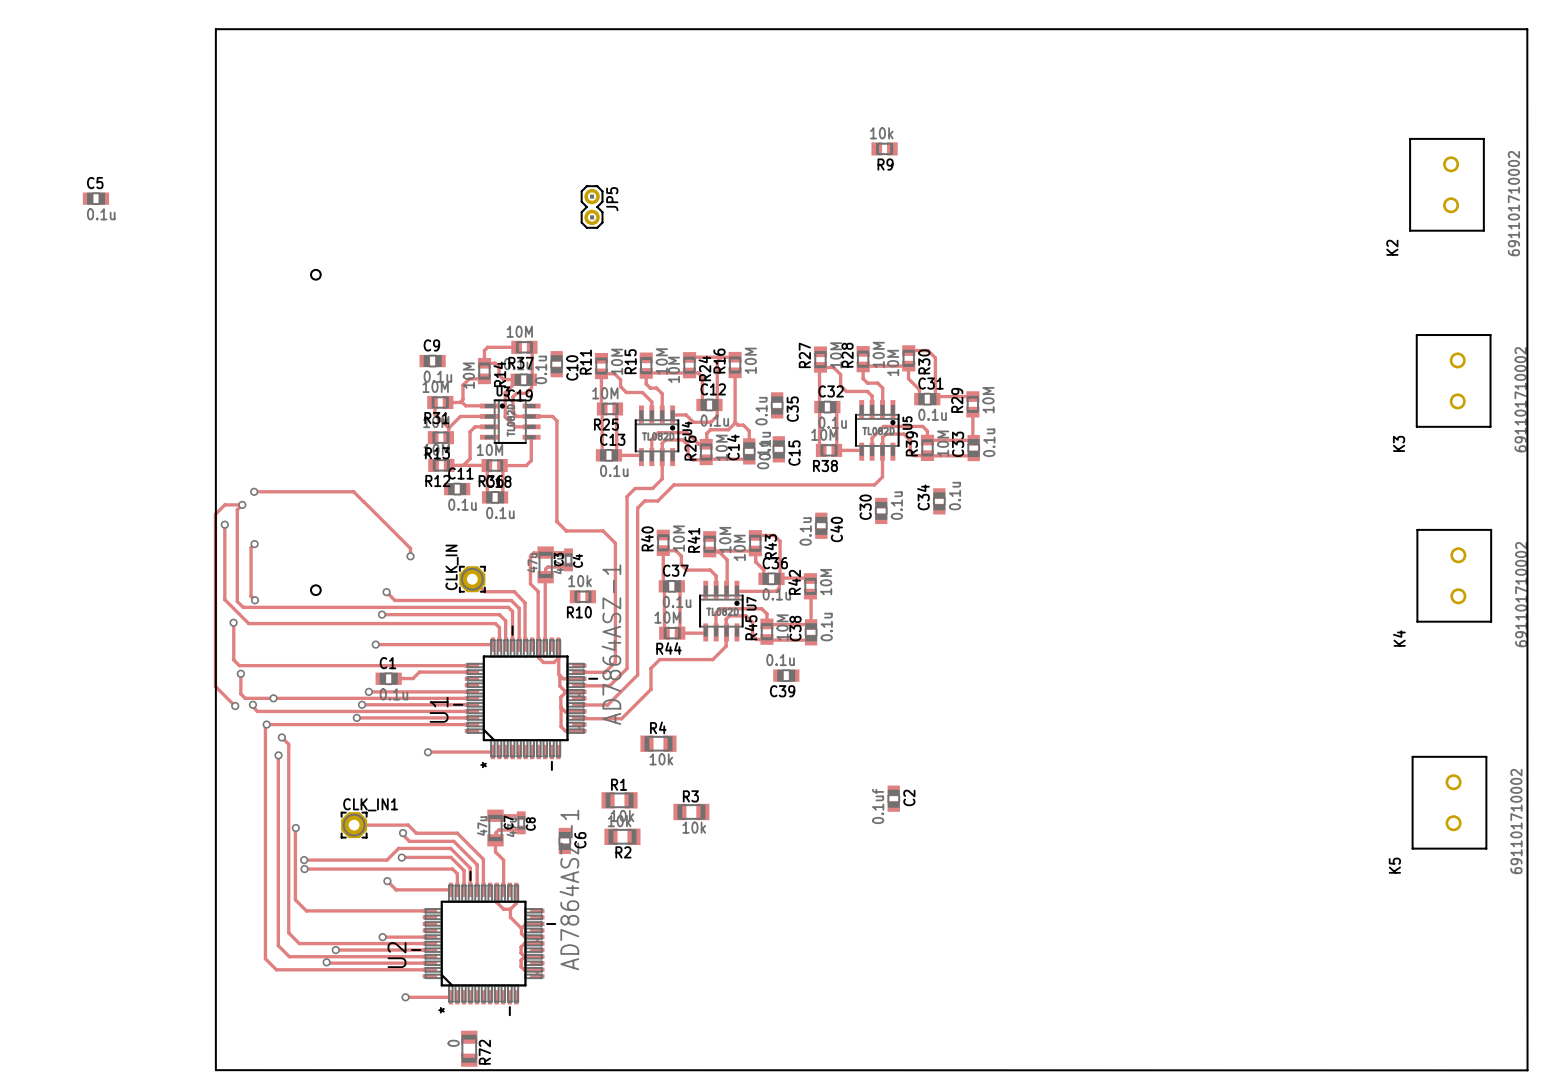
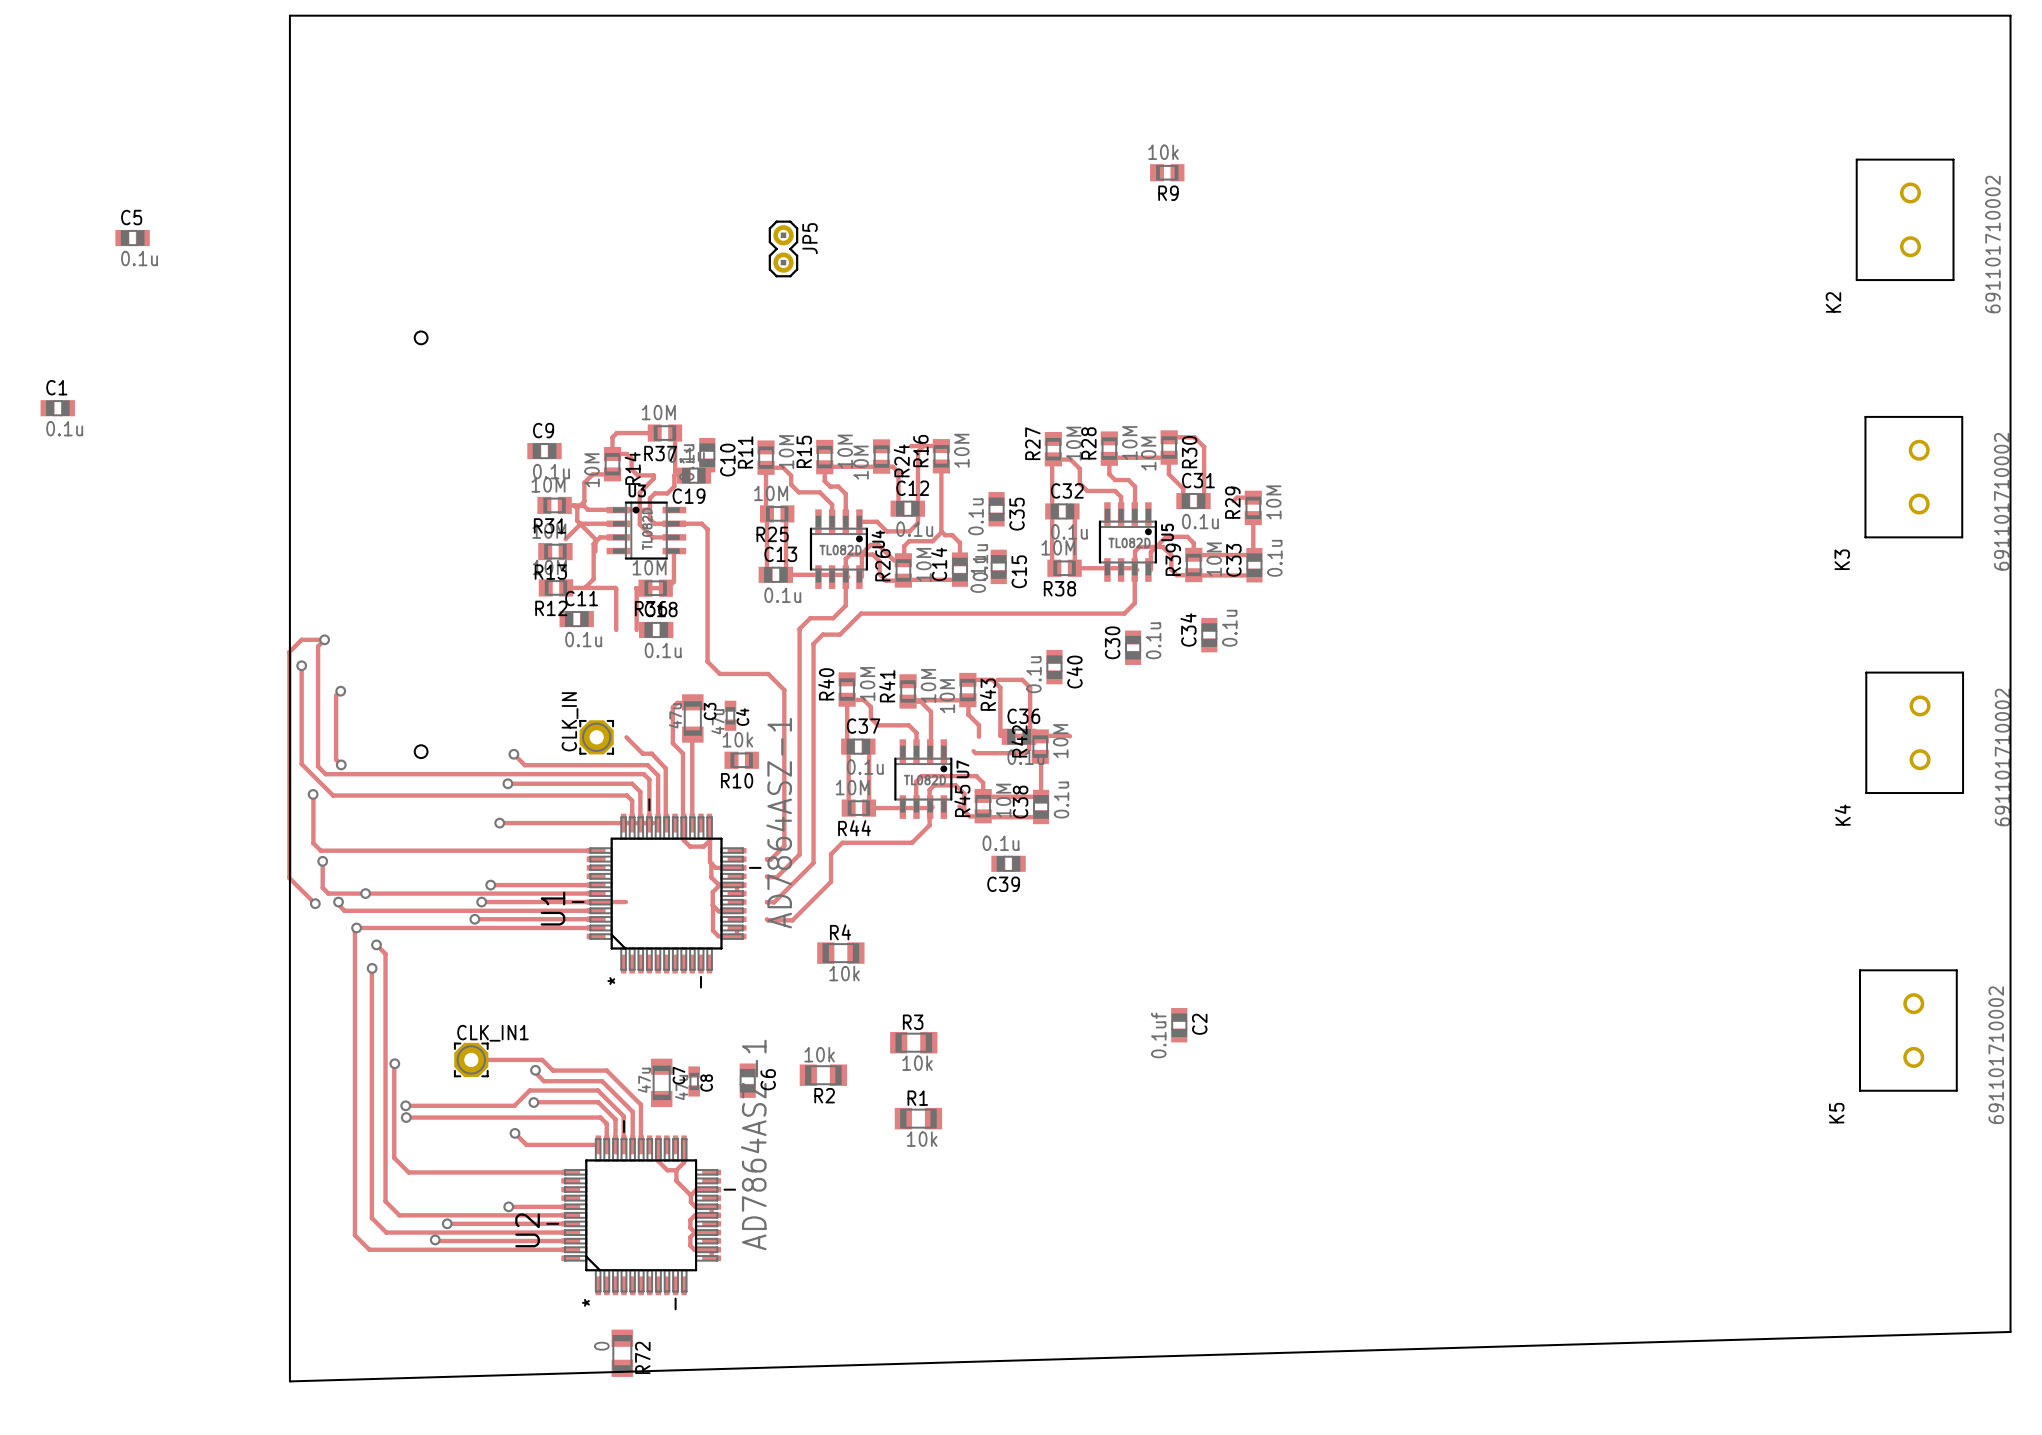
board edge: (1527, 29) (1527, 1070) (215, 1070) -> (2010, 15) (2010, 1331) (289, 1381)
track: (487, 347) (484, 350) (484, 363) (495, 363) (499, 366) (499, 375) (503, 379) (516, 379) (505, 392) (505, 417) (515, 426) (531, 426) -> (646, 433) (616, 433) (612, 437) (612, 453) (626, 453) (631, 458) (631, 469) (637, 475) (653, 475) (653, 478) (639, 492) (639, 524) (652, 537) (674, 537)
track: (493, 347) (516, 347) -> none
R37 position: (524, 347) -> (664, 433)
track: (532, 347) (531, 388) (526, 393) (516, 393) (512, 397) (512, 412) (516, 416) -> (675, 433) (674, 486) (667, 493) (654, 493) (649, 498) (649, 519) (654, 523) (684, 523)
track: (908, 350) (928, 350) (935, 357) (935, 398) -> (1169, 437) (1194, 437) (1204, 446) (1204, 500)
track: (712, 357) (735, 357) -> none
track: (721, 357) (717, 361) (717, 415) (710, 422) (693, 422) (686, 414) (672, 414) -> (923, 446) (917, 451) (917, 523) (909, 531) (886, 531) (877, 521) (859, 521)
R30 position: (908, 358) -> (1169, 447)
R27 position: (820, 359) -> (1053, 449)
R28 position: (863, 359) -> (1109, 448)
C9 position: (432, 361) -> (544, 451)
C10 position: (556, 364) -> (707, 455)
R15 position: (646, 365) -> (824, 457)
R24 position: (689, 365) -> (881, 456)
R16 position: (735, 365) -> (941, 456)
R11 position: (601, 366) -> (766, 457)
track: (863, 366) (863, 378) (867, 383) (877, 383) (882, 388) (882, 409) -> (1140, 457) (1109, 458) (1109, 474) (1115, 480) (1128, 480) (1135, 486) (1134, 514)
track: (886, 366) (908, 366) (908, 378) (919, 389) (919, 399) -> (1169, 457) (1168, 474) (1183, 488) (1183, 501)
R14 position: (484, 371) -> (612, 464)
track: (735, 372) (735, 423) (728, 429) (710, 429) (706, 433) (706, 444) (698, 444) (687, 432) (664, 432) -> (941, 466) (941, 532) (932, 541) (909, 541) (904, 546) (903, 560) (893, 560) (878, 545)
track: (601, 373) (601, 455) -> (766, 467) (765, 574)
track: (601, 373) (614, 373) (620, 379) (620, 386) (626, 392) (642, 392) (651, 401) (651, 414) -> (766, 467) (783, 467) (791, 475) (791, 484) (798, 492) (819, 492) (832, 504) (832, 521)
track: (646, 373) (646, 383) (650, 388) (656, 388) (662, 393) (662, 414) -> (855, 466) (824, 467) (824, 481) (830, 486) (838, 486) (845, 493) (845, 521)
track: (675, 373) (698, 373) (702, 377) (701, 404) -> (892, 466) (898, 472) (897, 508)
track: (484, 378) (469, 378) (462, 385) (462, 399) (460, 402) -> (612, 474) (592, 474) (584, 482) (584, 501) (580, 505)
track: (950, 396) (972, 396) -> none
C31 position: (927, 399) -> (1193, 501)
R31 position: (440, 402) -> (554, 505)
track: (448, 402) (462, 402) (465, 405) -> (564, 505) (583, 505) (587, 509) (617, 509)
C12 position: (709, 404) -> (907, 508)
R29 position: (972, 404) -> (1253, 507)
C35 position: (777, 405) -> (996, 509)
C32 position: (827, 407) -> (1062, 511)
track: (835, 407) (836, 408) (836, 450) -> (1072, 511) (1074, 513) (1074, 568) (1104, 568)
R25 position: (609, 408) -> (777, 513)
track: (617, 408) (616, 455) -> (787, 513) (786, 574) (815, 574)
track: (872, 409) (872, 396) (867, 391) (846, 391) (840, 385) (840, 374) (833, 367) (820, 367) (819, 448) (821, 450) -> (1121, 514) (1121, 496) (1115, 490) (1087, 490) (1079, 483) (1079, 468) (1070, 459) (1053, 459) (1052, 566) (1054, 568)
track: (972, 412) (973, 440) (951, 440) -> (1253, 518) (1254, 555)
track: (460, 416) (448, 428) -> (610, 523) (581, 523) (565, 539)
track: (466, 416) (488, 416) -> (566, 587) (595, 587)
track: (529, 416) (552, 416) (556, 420) (556, 521) (566, 530) -> (701, 523) (707, 529) (707, 661) (719, 673) (749, 673)
U3 position: (510, 421) -> (646, 530)
track: (735, 422) (738, 425) (743, 425) (749, 431) (749, 443) -> (941, 531) (945, 535) (952, 535) (959, 542) (959, 559)
track: (488, 426) (475, 426) (470, 431) (470, 458) (463, 465) -> (618, 537) (600, 537) (593, 543) (593, 579) (584, 587)
track: (899, 426) (922, 426) (927, 431) (927, 440) -> (1187, 536) (1193, 543) (1194, 555) (1223, 555)
U5 position: (877, 430) -> (1127, 542)
U4 position: (657, 435) -> (838, 549)
R13 position: (440, 437) -> (555, 551)
track: (531, 437) (531, 460) (526, 465) (503, 465) -> (674, 551) (673, 581) (667, 588)
R39 position: (927, 447) -> (1193, 564)
C33 position: (973, 448) -> (1254, 565)
C15 position: (778, 449) -> (998, 566)
R38 position: (829, 450) -> (1064, 568)
C14 position: (749, 451) -> (959, 569)
R26 position: (706, 452) -> (903, 570)
C13 position: (608, 455) -> (775, 574)
track: (927, 455) (914, 455) (910, 451) (910, 440) (903, 434) (886, 434) (882, 437) (882, 477) (874, 484) (851, 484) -> (1223, 575) (1176, 575) (1171, 569) (1171, 555) (1162, 546) (1139, 546) (1135, 551) (1134, 603) (1124, 613)
track: (951, 455) (973, 455) -> none
track: (706, 459) (692, 459) (688, 454) (688, 445) (682, 439) (665, 439) (662, 443) (662, 478) (652, 488) (635, 488) (627, 496) (627, 668) (609, 685) (587, 685) -> (933, 579) (886, 580) (879, 574) (879, 561) (872, 554) (850, 554) (845, 558) (845, 605) (833, 618) (810, 618) (799, 628) (799, 854) (776, 877)
track: (726, 459) (749, 459) -> none
R12 position: (441, 465) -> (555, 587)
track: (463, 465) (487, 465) (487, 497) -> (615, 587) (616, 629)
track: (502, 465) (502, 497) -> (665, 588) (636, 588) (636, 629)
track: (673, 484) (657, 500) (644, 500) (637, 508) (637, 675) (607, 704) (584, 704) -> (890, 613) (861, 613) (840, 634) (822, 634) (813, 643) (813, 862) (774, 902)
C11 position: (457, 489) -> (576, 619)
track: (254, 491) (353, 491) (410, 548) (410, 556) -> none
via: (254, 491) -> none
C34 position: (939, 501) -> (1209, 635)
C30 position: (881, 510) -> (1133, 647)
C40 position: (821, 525) -> (1054, 667)
track: (580, 530) (603, 530) (615, 543) (615, 662) (605, 672) (582, 672) -> (768, 673) (784, 690) (784, 846) (770, 859)
track: none -> (967, 679) (992, 679) (1000, 687) (1000, 735) (1030, 735)
R40 position: (663, 542) -> (847, 689)
R43 position: (755, 543) -> (967, 690)
R41 position: (709, 544) -> (908, 691)
track: (710, 551) (719, 552) (727, 559) (726, 589) -> (939, 700) (908, 701) (920, 701) (930, 711) (930, 751)
track: (732, 551) (755, 551) (755, 561) (763, 570) (763, 578) -> (967, 700) (968, 714) (978, 725) (978, 736)
track: none -> (692, 702) (677, 702) (672, 707) (672, 743) (682, 753) (683, 840) (690, 846) (703, 846) (710, 840)
track: (568, 552) (533, 553) (530, 556) (530, 583) (538, 591) (538, 657) (543, 662) (553, 662) (558, 657) -> none
via: (410, 556) -> none
C4 position: (568, 559) -> (730, 715)
C3 position: (545, 564) -> (692, 718)
track: (568, 567) (547, 567) (545, 569) (545, 644) -> none
track: (686, 570) (681, 564) (681, 556) (675, 550) (663, 550) (664, 633) -> (907, 725) (878, 725) (870, 718) (870, 707) (863, 699) (847, 699) (848, 808)
track: (687, 570) (710, 570) (716, 575) (716, 589) -> (908, 725) (916, 732) (916, 751)
track: none -> (692, 734) (692, 823)
CLK_IN position: (472, 579) -> (596, 737)
C37 position: (671, 586) -> (858, 746)
track: (679, 586) (680, 633) -> (868, 746) (869, 808) (898, 808)
R42 position: (810, 586) -> (1040, 746)
track: (491, 591) (514, 591) (525, 602) (525, 644) -> (651, 753) (665, 768) (666, 823)
track: (810, 594) (811, 624) (788, 624) -> (1040, 756) (1041, 796)
R10 position: (582, 596) -> (741, 760)
track: (488, 600) (511, 600) (519, 608) (519, 644) -> (647, 765) (658, 775) (658, 823)
track: (485, 607) (508, 607) (512, 611) (512, 644) -> (643, 774) (649, 779) (649, 823)
track: (720, 608) (715, 613) (716, 632) -> (951, 776) (921, 776) (916, 781) (916, 807)
track: (739, 608) (761, 608) (766, 614) (767, 624) -> (976, 776) (983, 782) (983, 796) (1013, 796)
U7 position: (721, 611) -> (923, 779)
track: (476, 614) (499, 614) (505, 620) (506, 644) -> (632, 783) (640, 791) (640, 823)
track: (472, 623) (495, 623) (499, 627) (499, 644) -> (626, 795) (632, 800) (632, 823)
R45 position: (766, 631) -> (983, 806)
C38 position: (811, 632) -> (1041, 806)
R44 position: (672, 633) -> (858, 808)
track: (767, 640) (756, 639) (752, 635) (752, 622) (746, 615) (729, 615) (726, 619) (726, 646) (712, 659) (690, 659) -> (1013, 817) (969, 816) (964, 811) (964, 793) (955, 785) (933, 785) (929, 789) (929, 825) (912, 842)
track: (788, 640) (811, 640) -> none
track: (558, 644) (558, 674) (563, 678) (579, 678) -> (709, 823) (710, 862) (715, 867) (737, 867)
track: (659, 659) (650, 668) (650, 689) (621, 718) (598, 718) -> (872, 842) (842, 842) (831, 854) (831, 881) (792, 920)
track: (449, 665) (471, 665) -> none
track: (471, 672) (419, 672) (413, 678) (396, 678) -> none
track: (560, 675) (559, 686) (565, 691) (579, 691) (579, 698) -> (711, 864) (711, 877) (718, 885) (737, 885) (737, 893)
C39 position: (786, 675) -> (1008, 863)
C1 position: (388, 678) -> (57, 408)
track: (449, 691) (471, 691) -> none
track: (566, 691) (560, 697) (560, 707) (565, 711) (579, 711) -> (719, 885) (712, 892) (712, 905) (718, 911) (737, 910)
track: (449, 698) (471, 698) -> none
U1 position: (525, 698) -> (666, 893)
track: (561, 707) (561, 726) (565, 730) (579, 731) (579, 724) -> (713, 905) (713, 930) (718, 936) (737, 936) (737, 927)
track: (449, 711) (471, 711) -> none
track: (449, 717) (471, 717) -> none
track: (449, 724) (471, 724) -> none
R4 position: (658, 743) -> (840, 953)
via: (428, 752) -> none
track: (492, 752) (428, 752) -> none
R1 position: (619, 800) -> (918, 1118)
track: (495, 815) (521, 815) -> none
C8 position: (521, 822) -> (694, 1081)
C7 position: (495, 828) -> (661, 1082)
track: (521, 830) (498, 830) (496, 832) (495, 851) (503, 860) (503, 889) -> none
track: (405, 997) (450, 997) -> none
via: (405, 997) -> none

